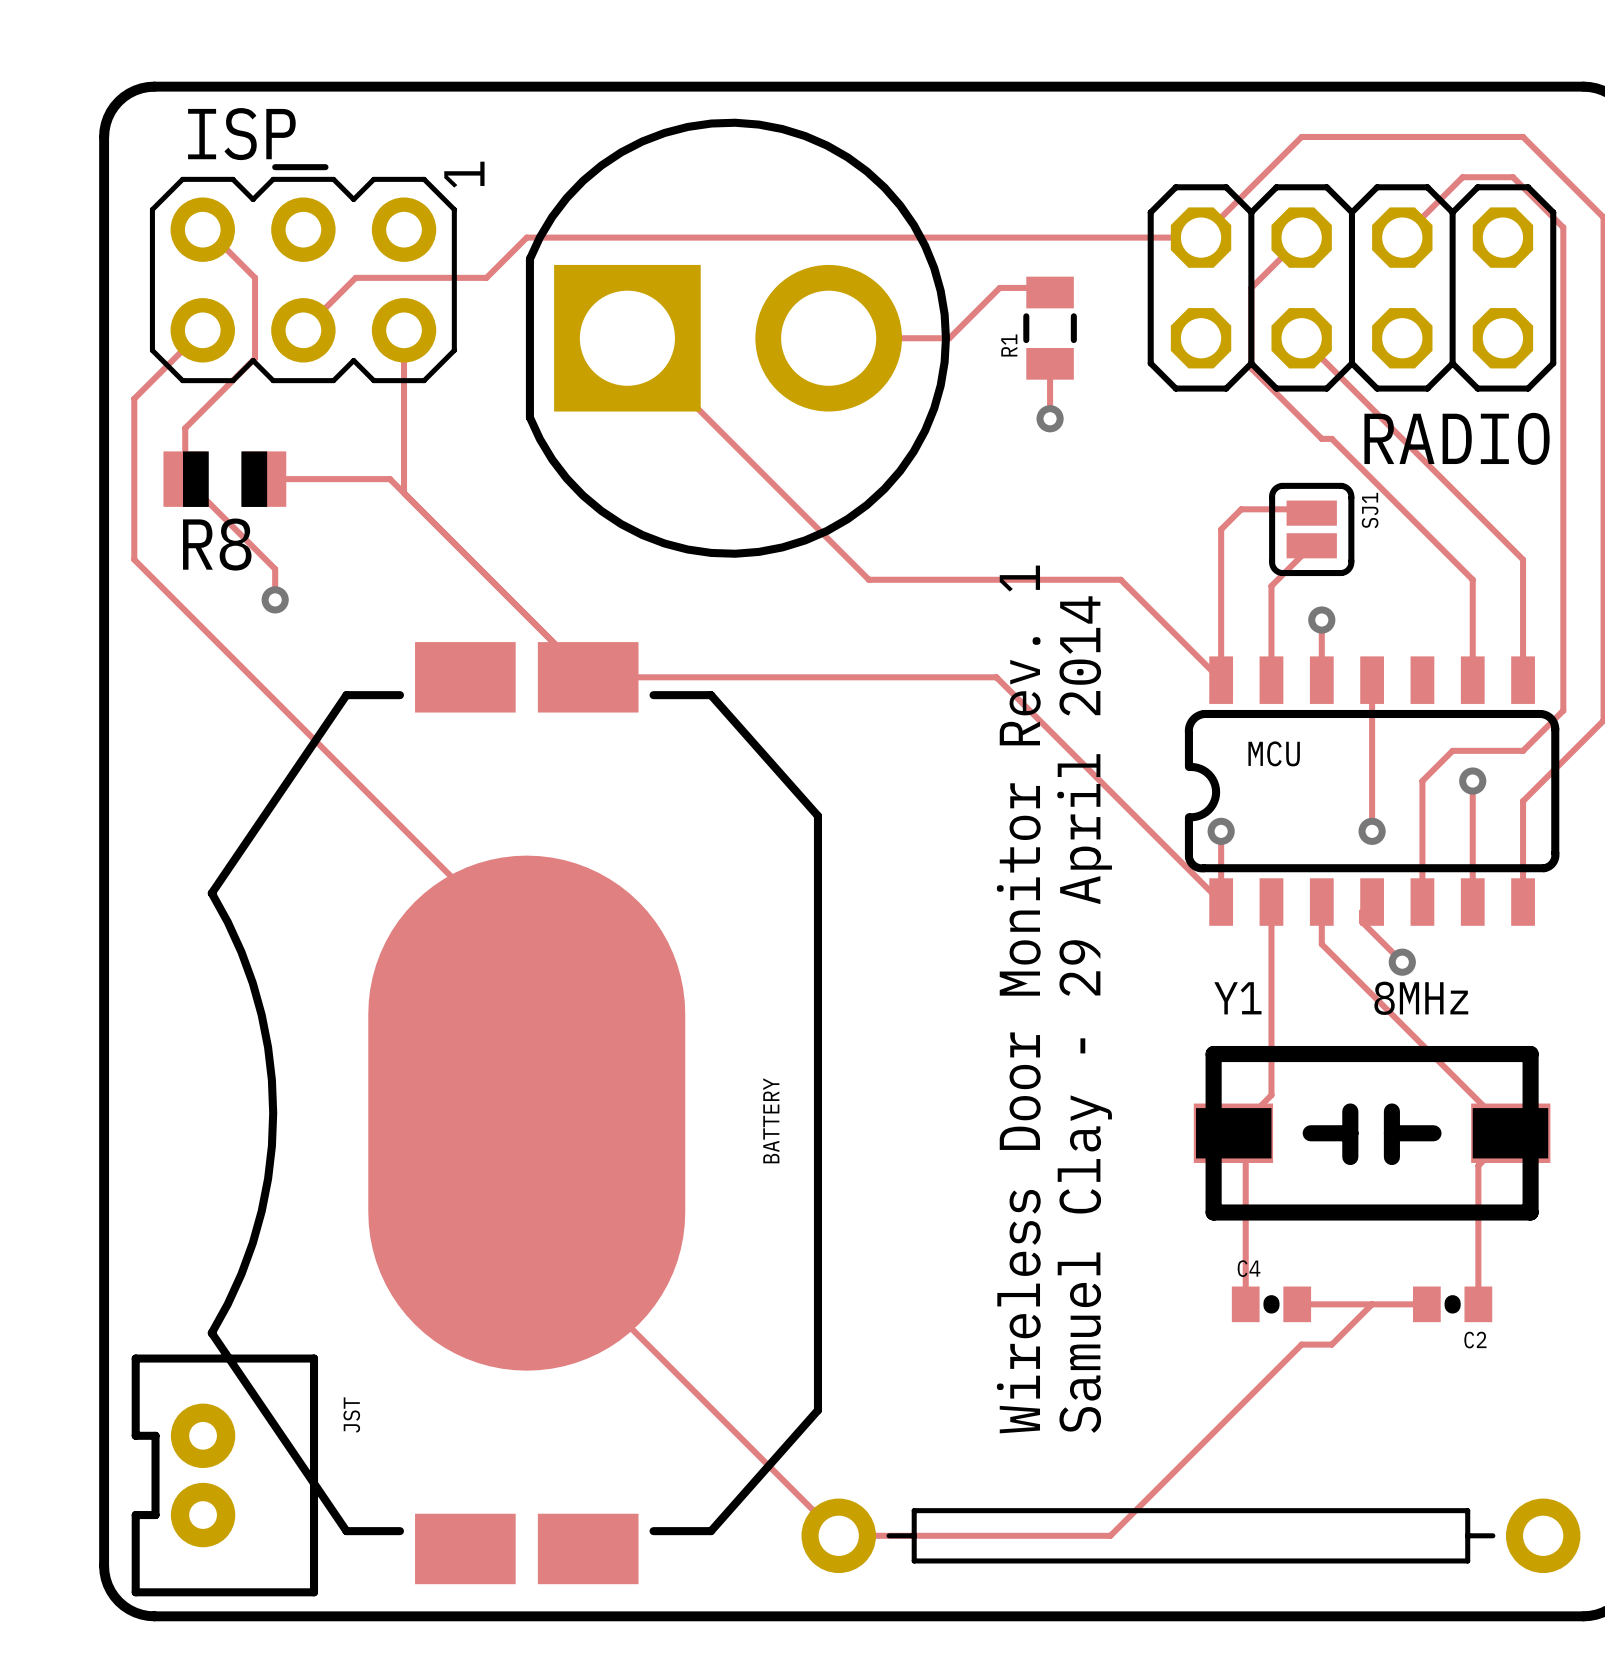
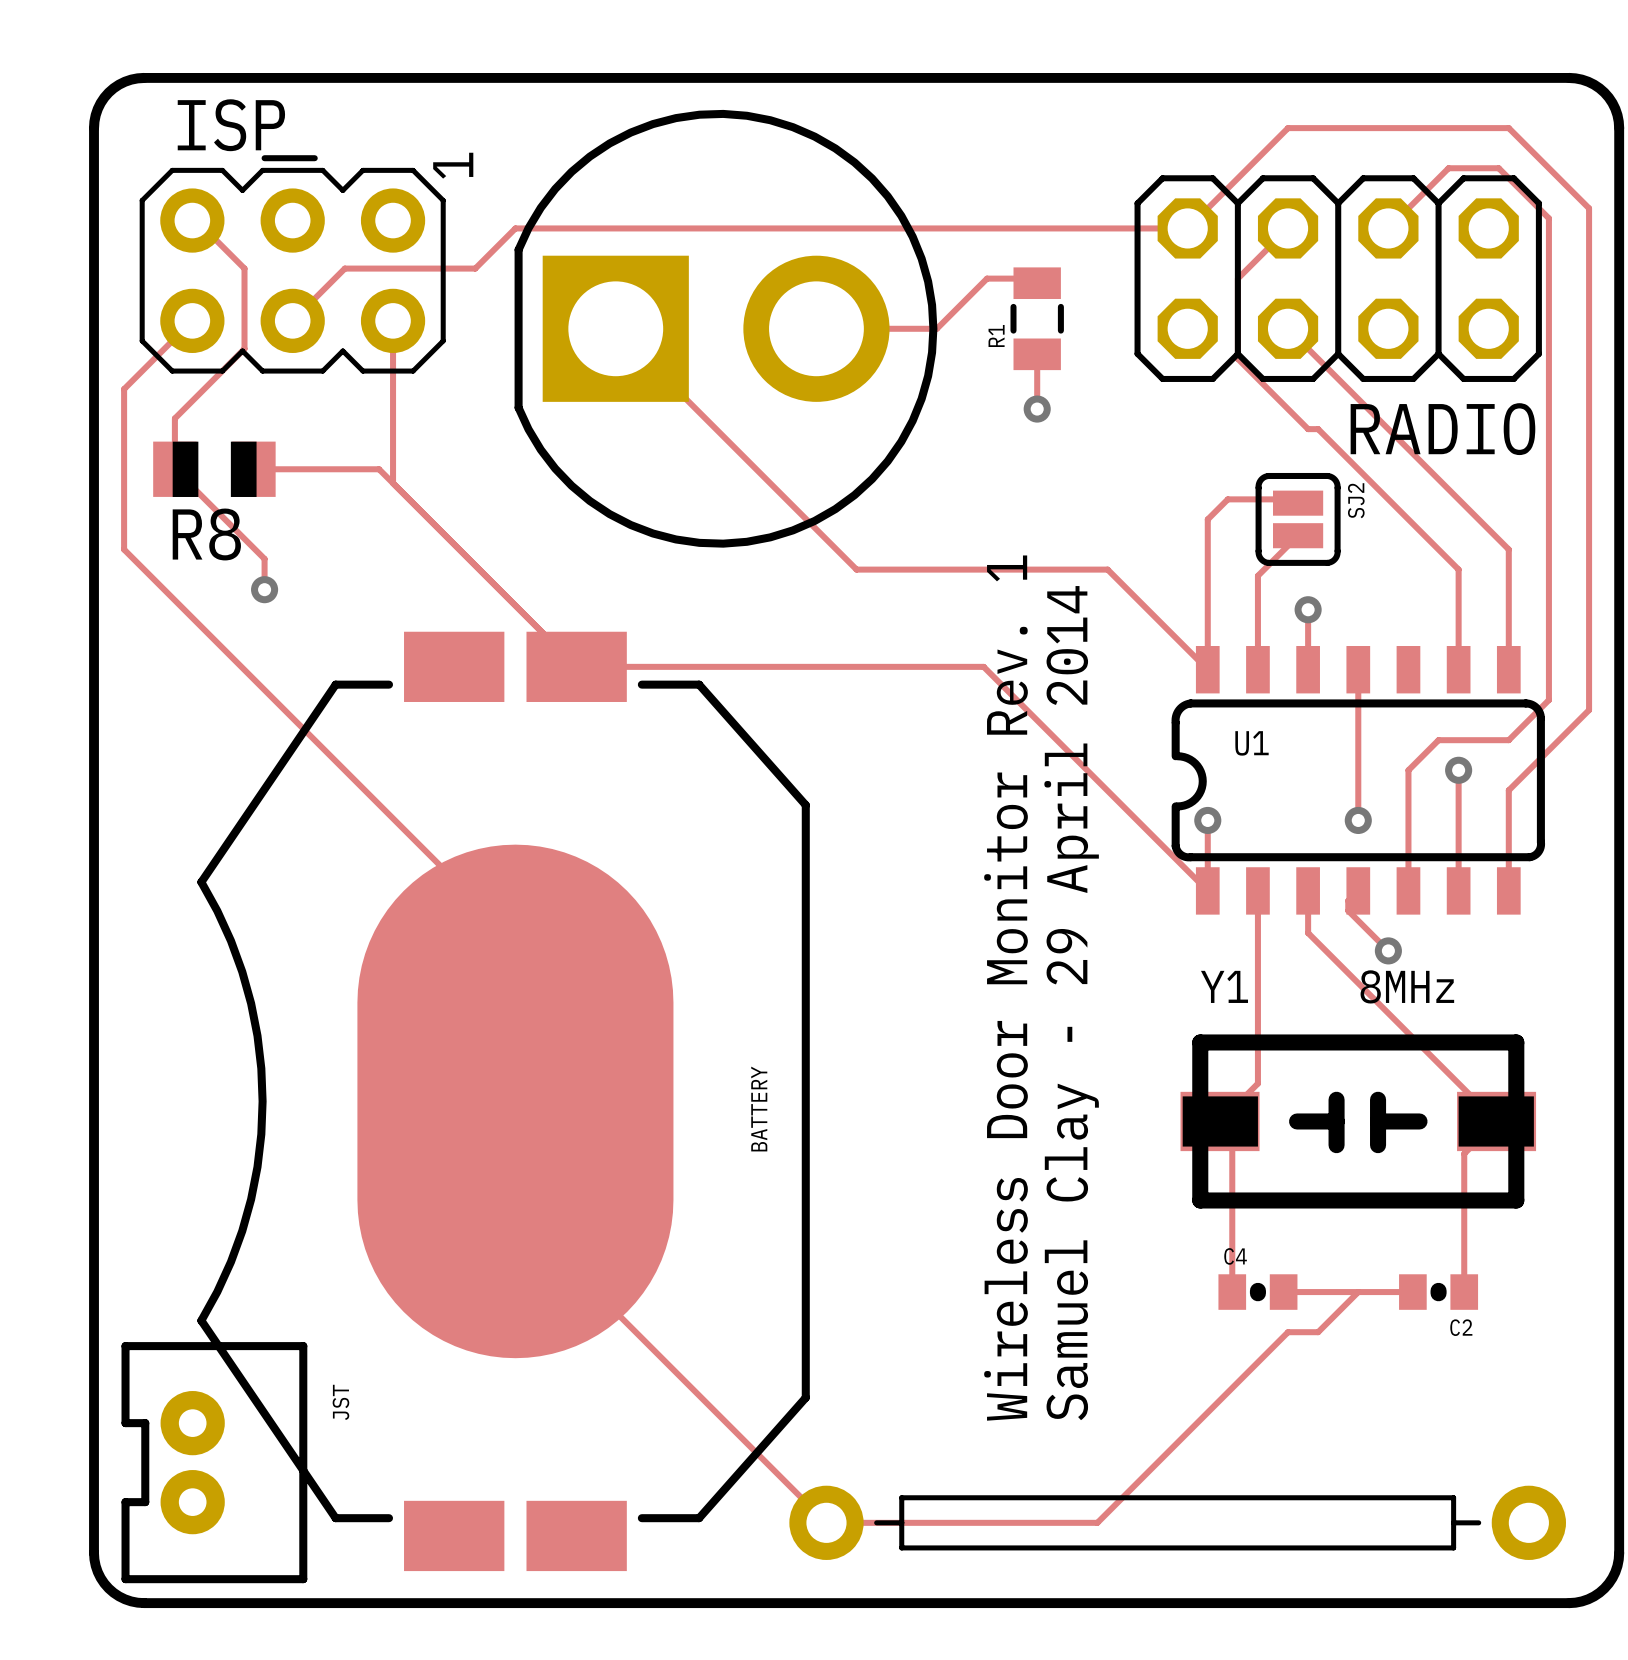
SJ1 name: SJ1 (1370, 510) -> SJ2 (1356, 500)
MCU name: MCU (1274, 753) -> U1 (1252, 743)

